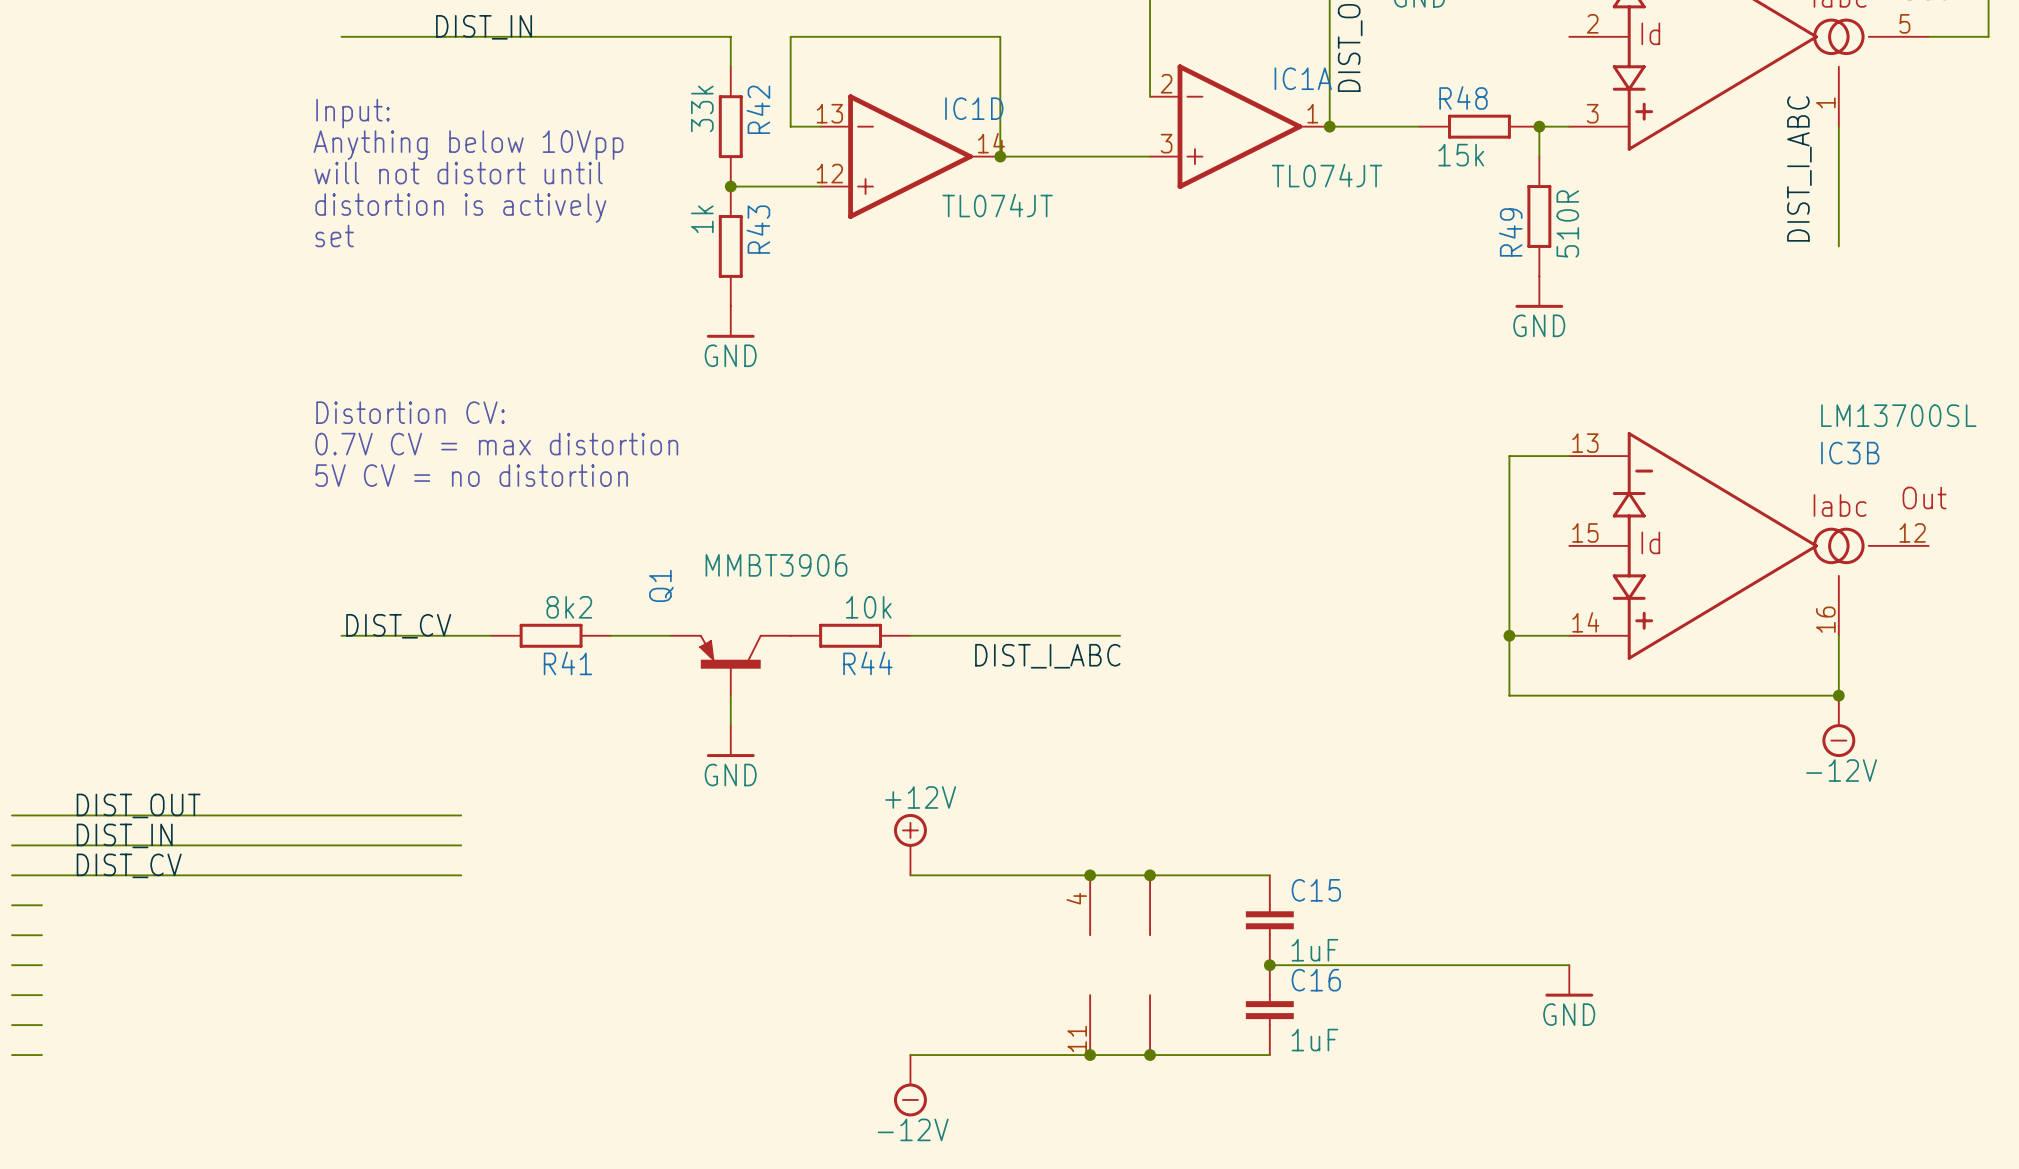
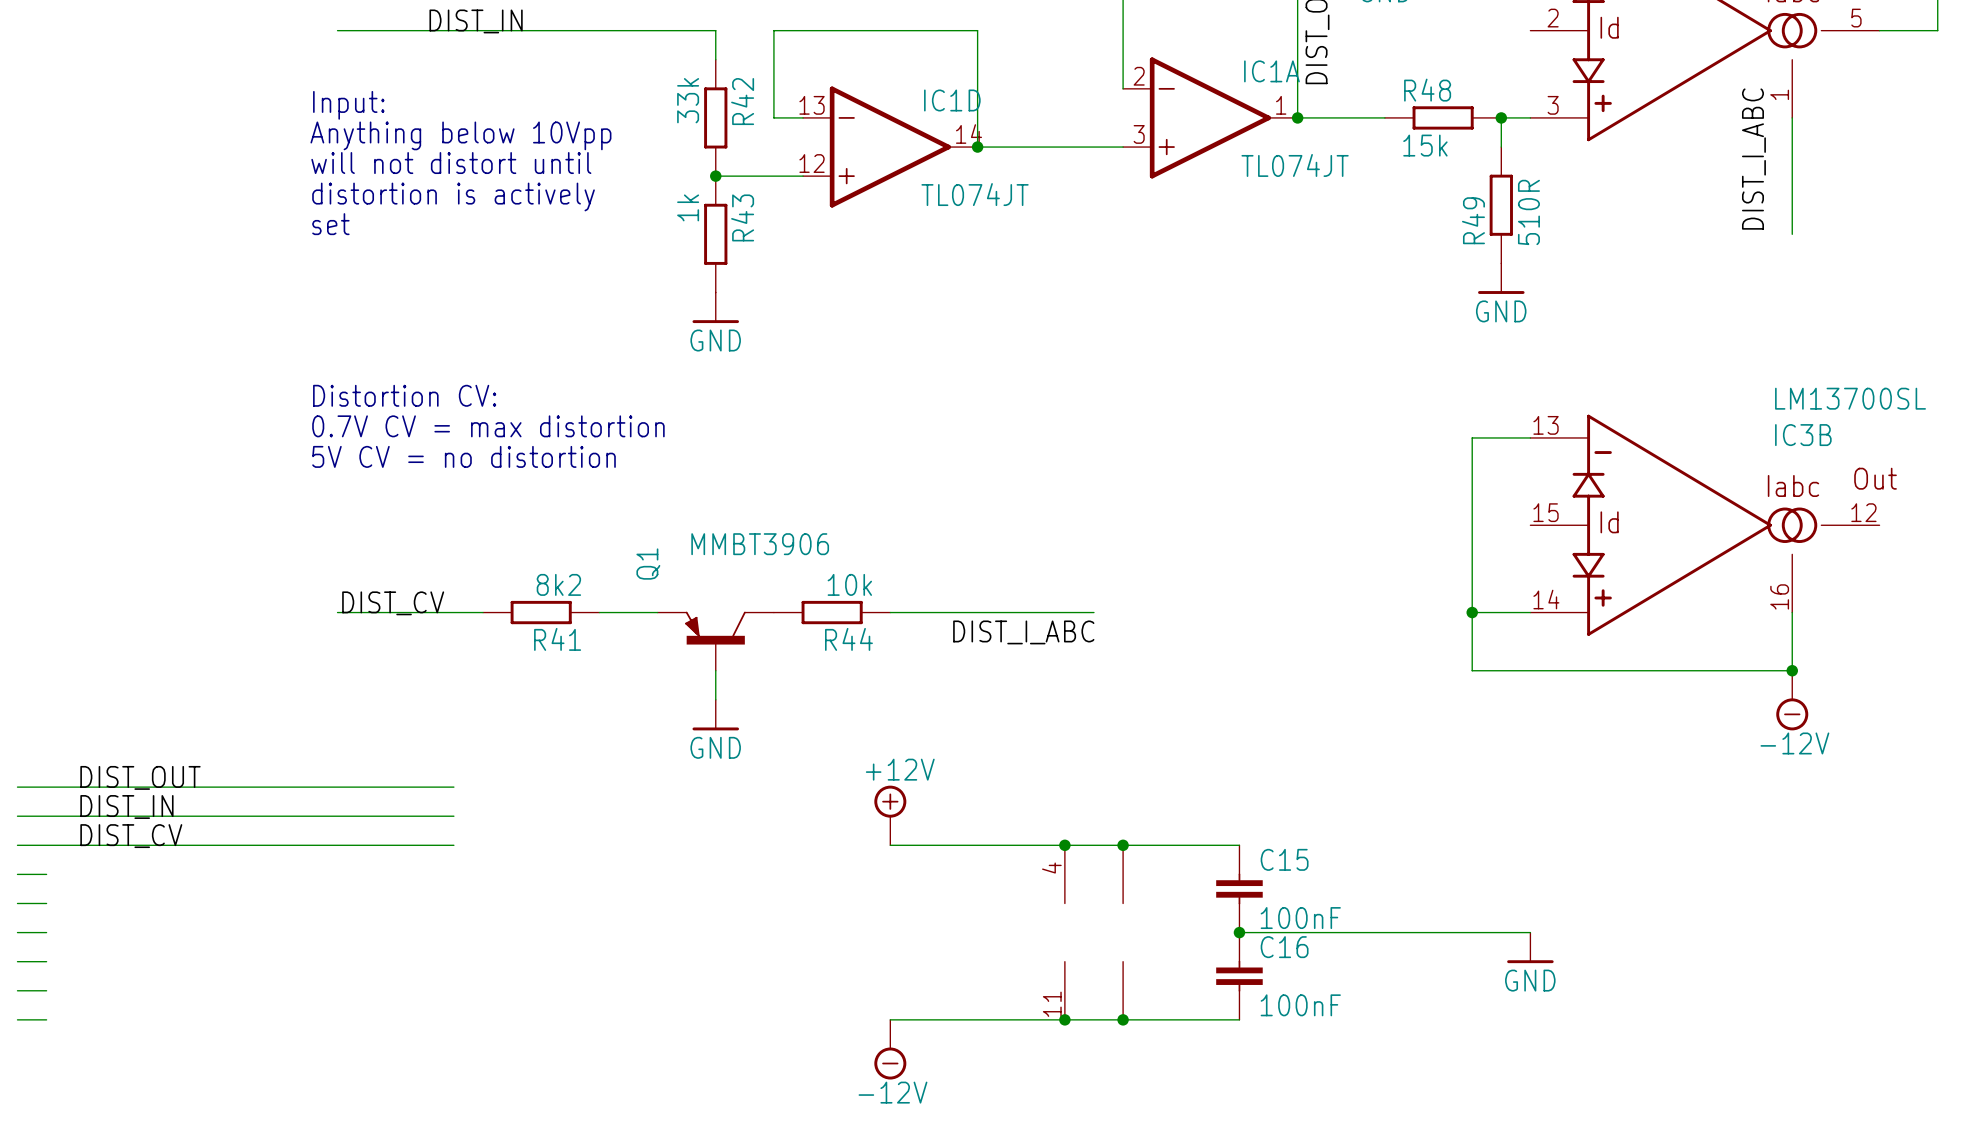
C15 value: 1uF (1314, 950) -> 100nF (1300, 918)
C16 value: 1uF (1314, 1040) -> 100nF (1300, 1005)

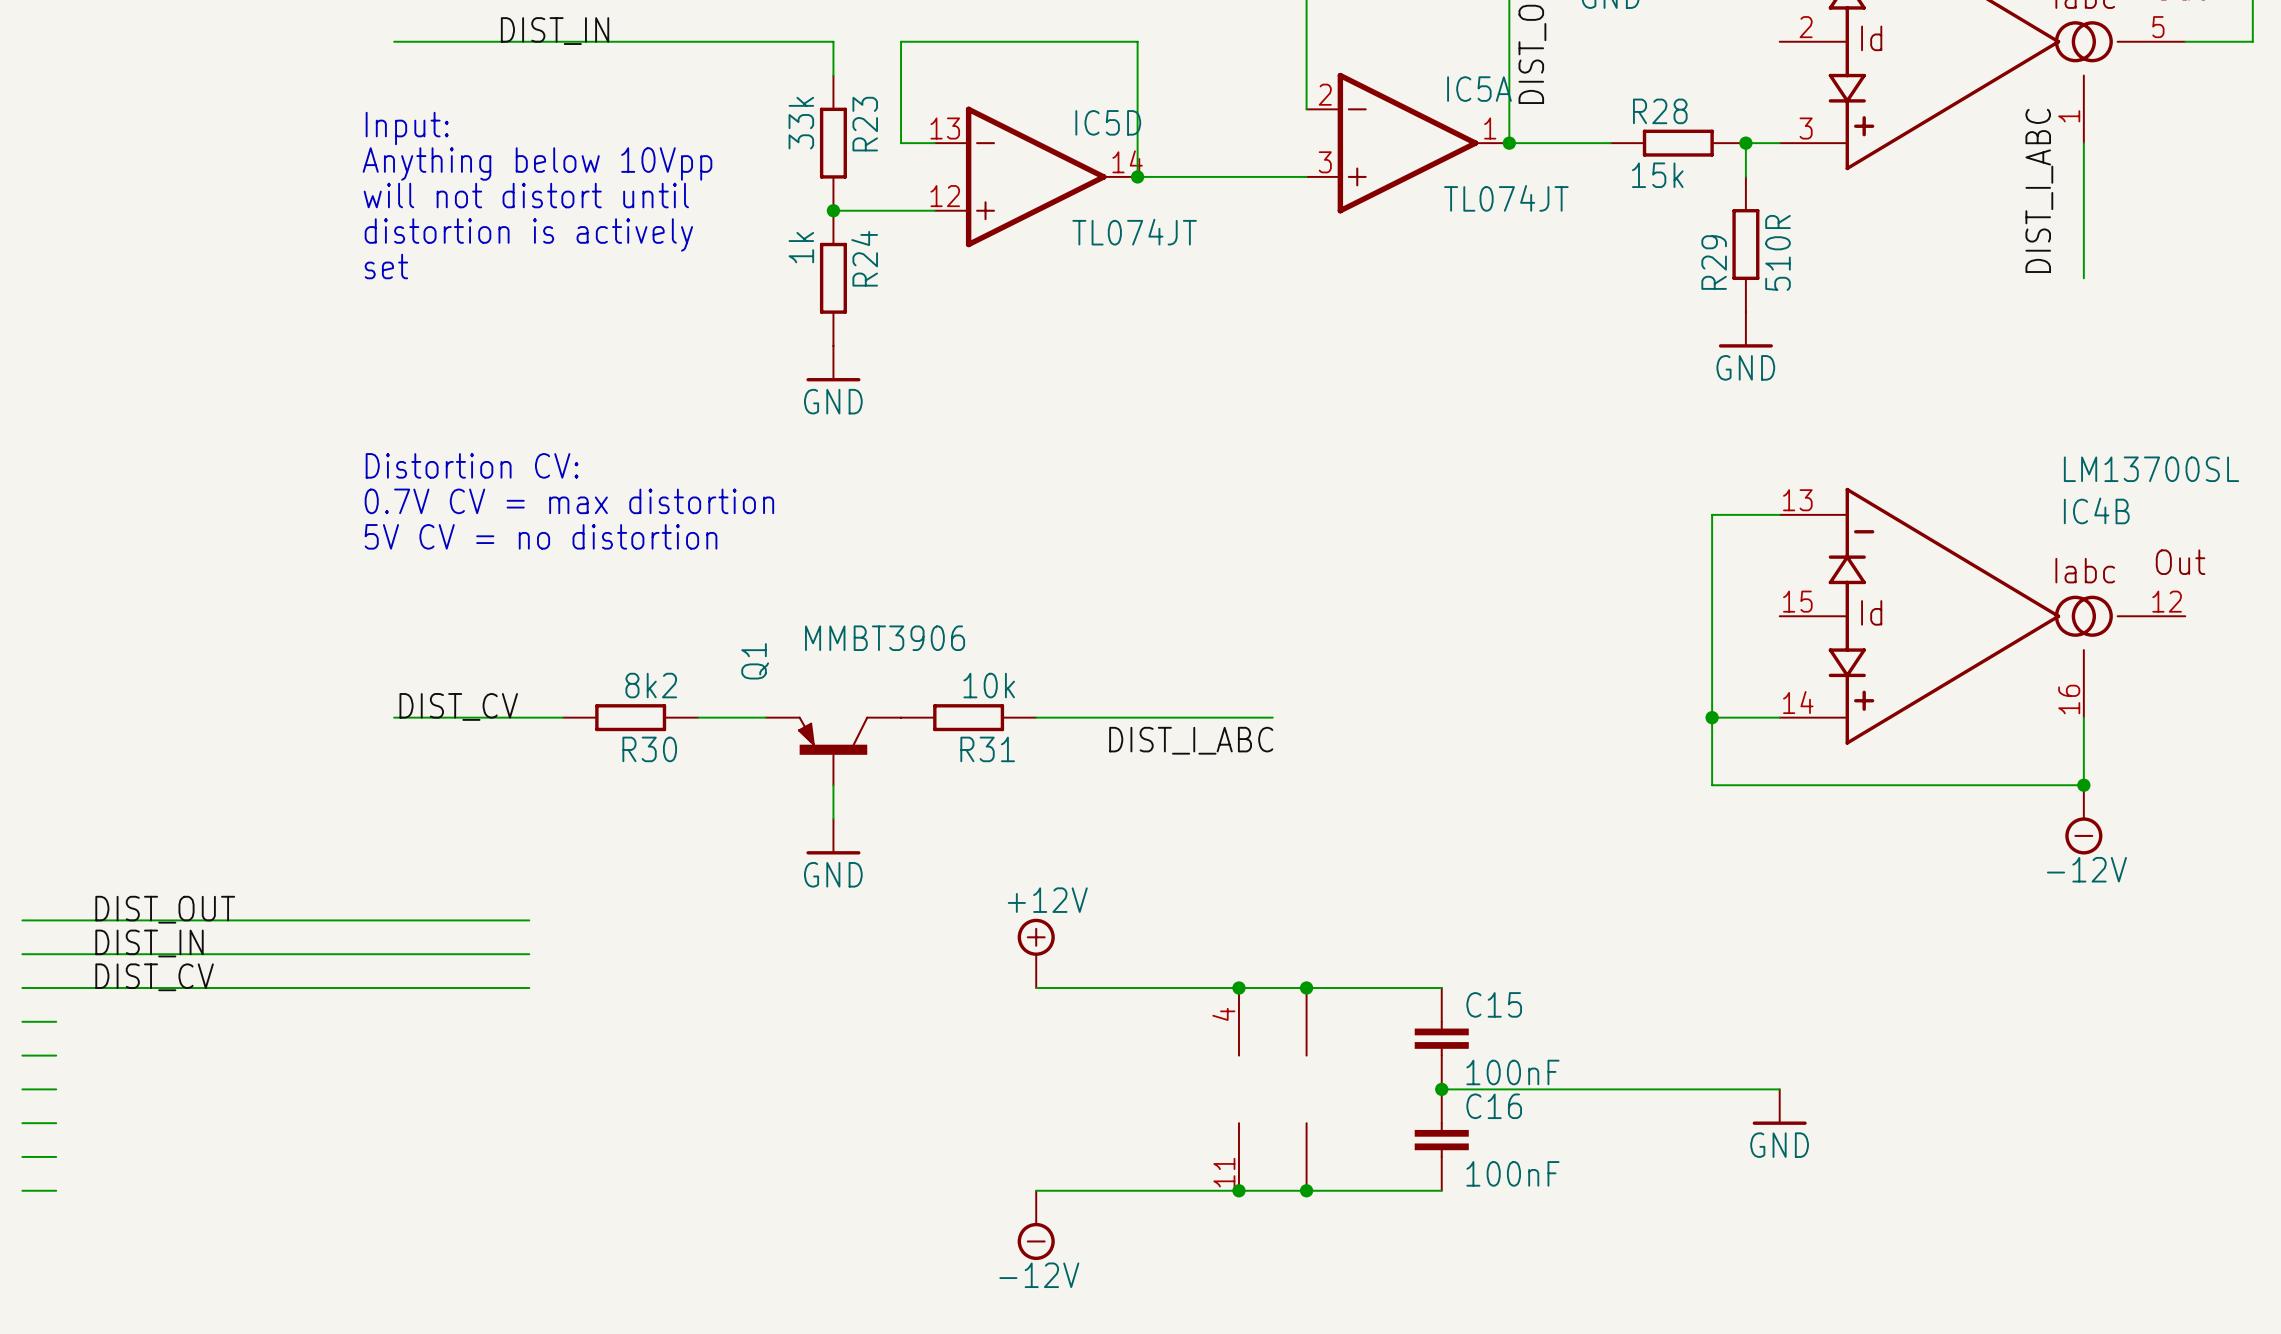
IC1A name: IC1A (1271, 71) -> IC5A (1479, 89)
R48 name: R48 (1427, 90) -> R28 (1660, 111)
IC1D name: IC1D (952, 100) -> IC5D (1108, 122)
R42 name: R42 (742, 101) -> R23 (865, 124)
R43 name: R43 (742, 217) -> R24 (864, 258)
R49 name: R49 (1473, 220) -> R29 (1714, 262)
IC3B name: IC3B (1803, 435) -> IC4B (2096, 510)
R41 name: R41 (557, 639) -> R30 (649, 749)
R44 name: R44 (848, 639) -> R31 (987, 749)

